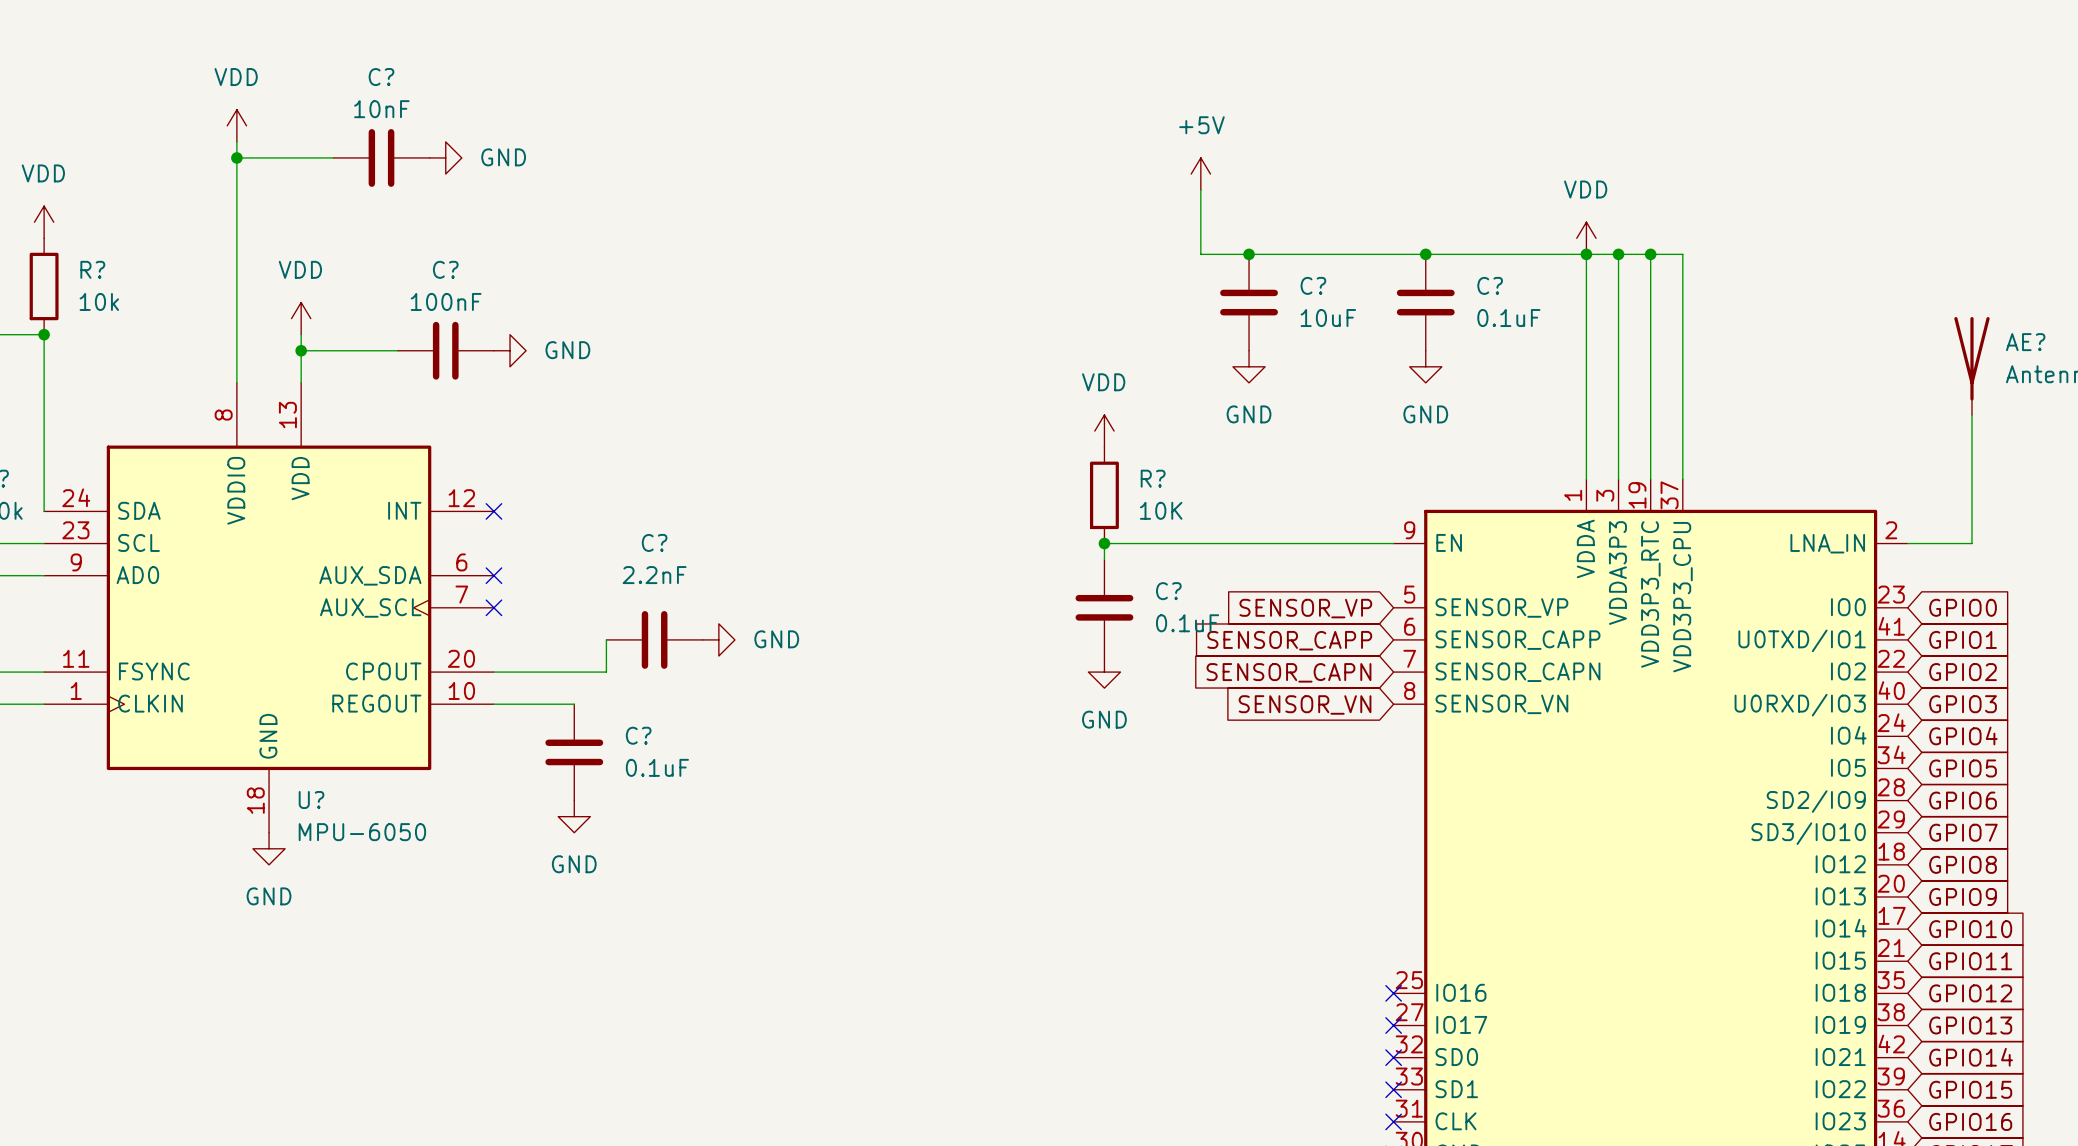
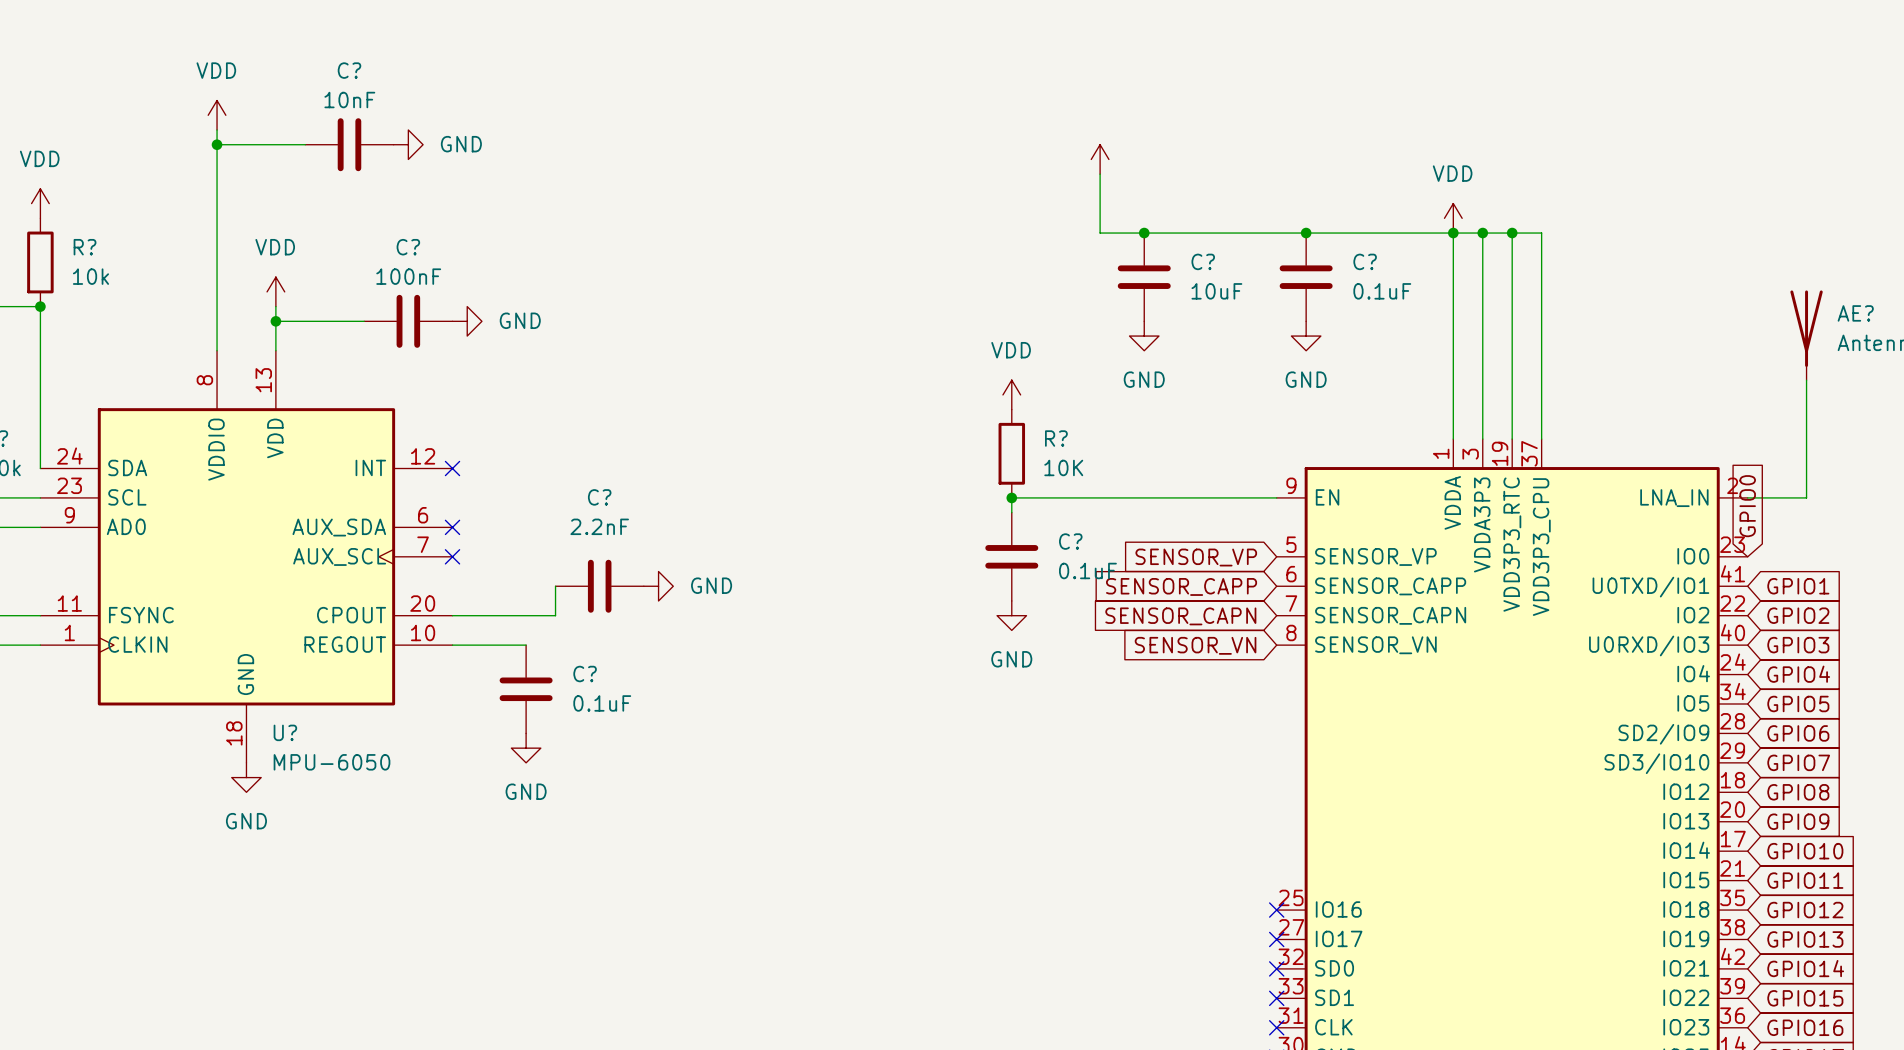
power symbol text: +5V (1201, 125) -> none
global label rotation: 0° (1963, 607) -> 90° counterclockwise (1747, 506)

